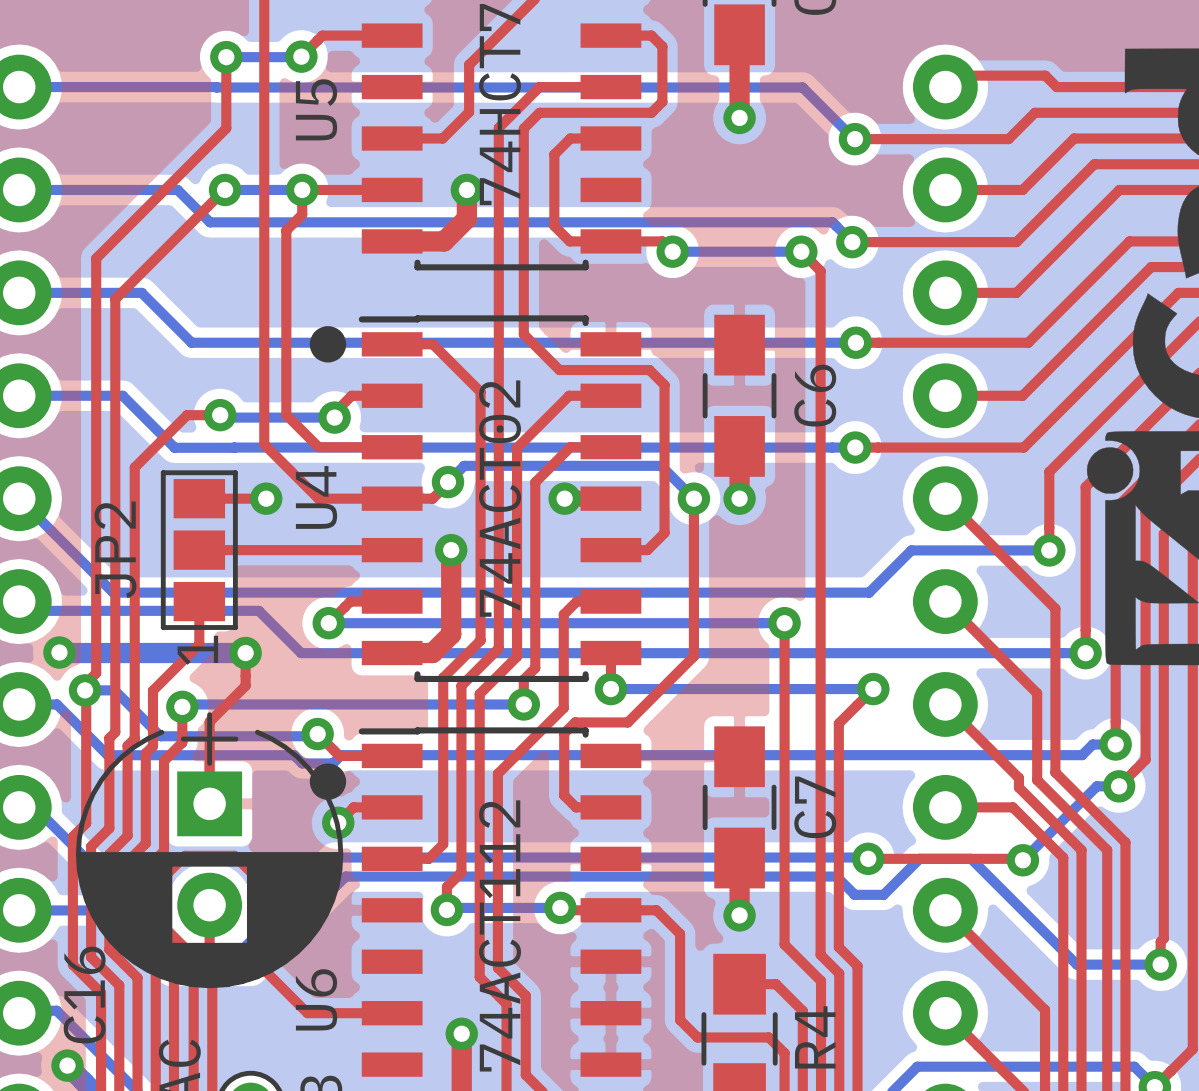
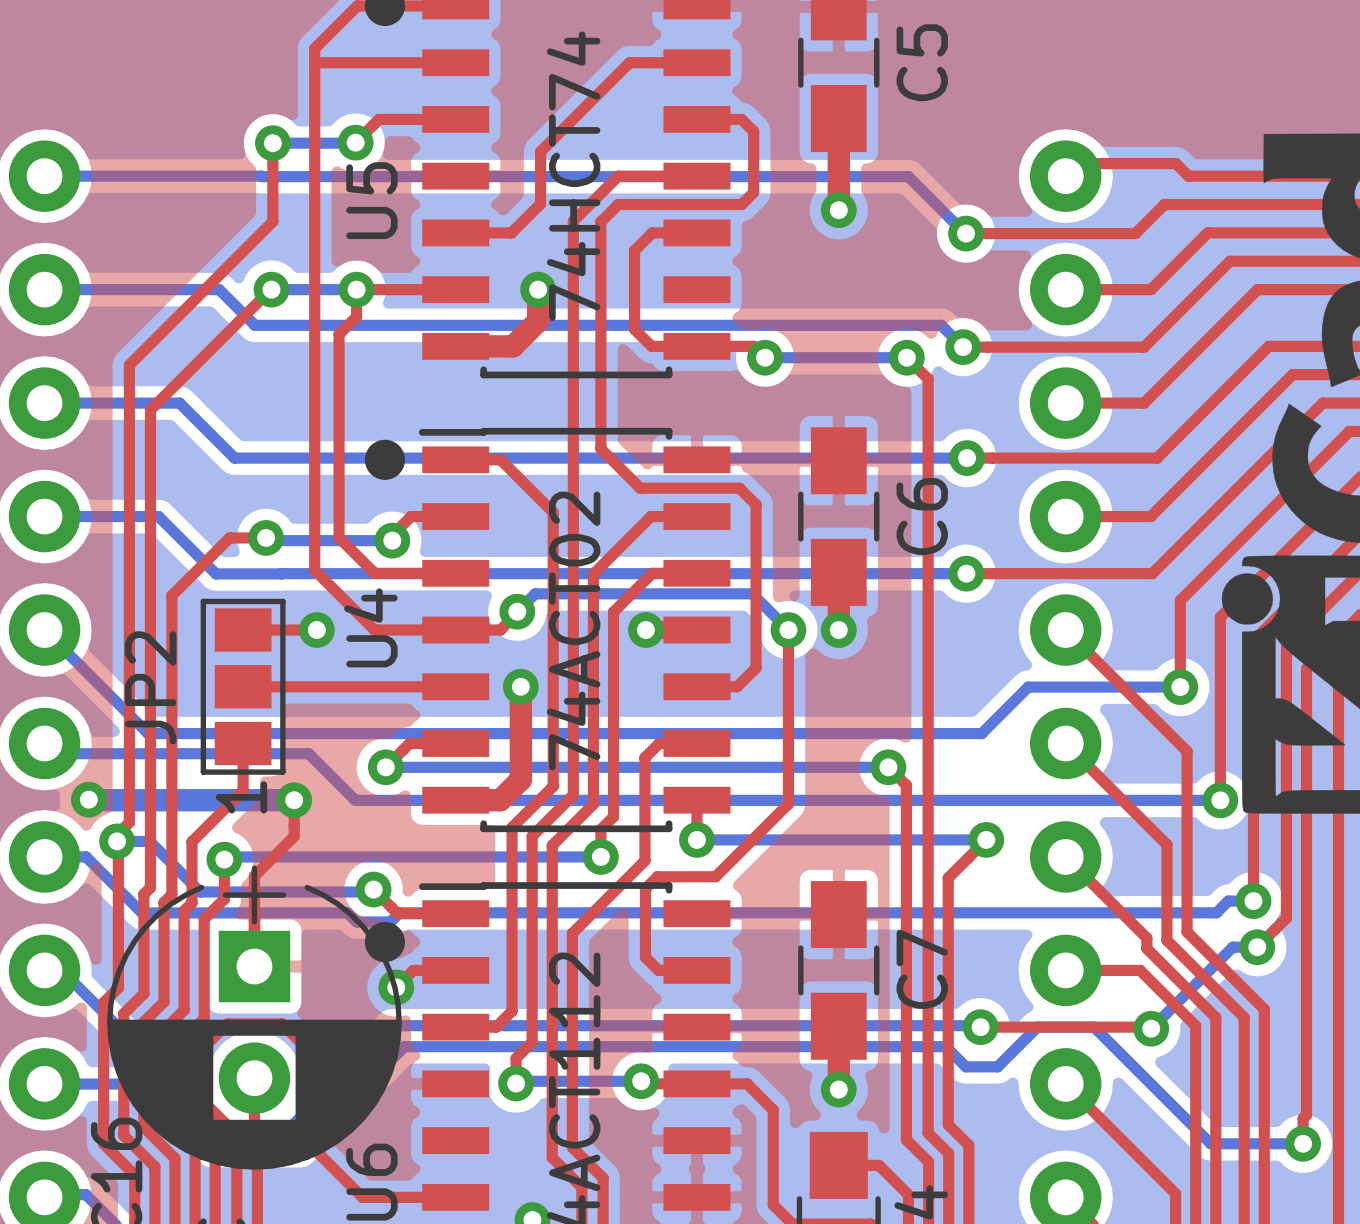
top track: (784, 623) (784, 944) (800, 960) -> (888, 767) (906, 785) (906, 1139)

